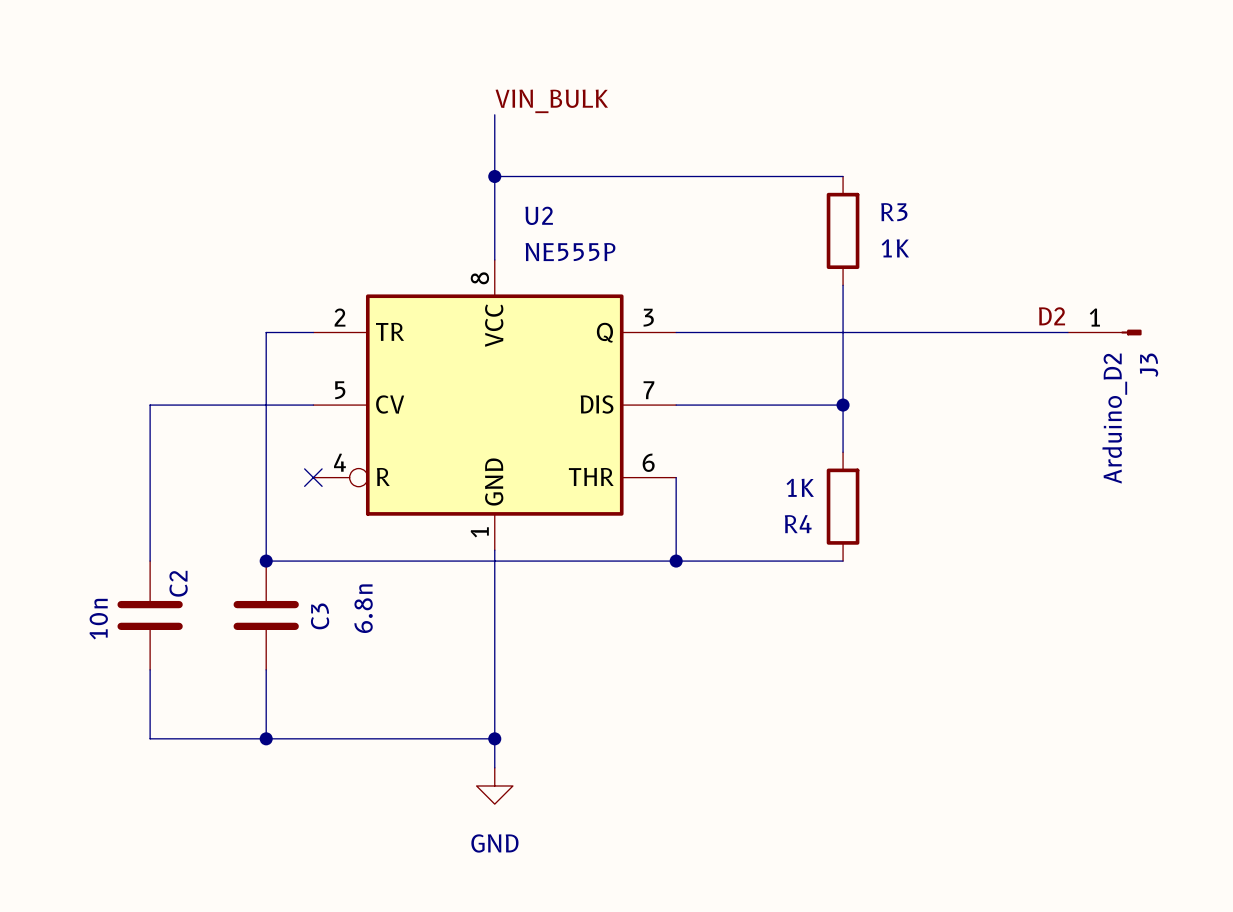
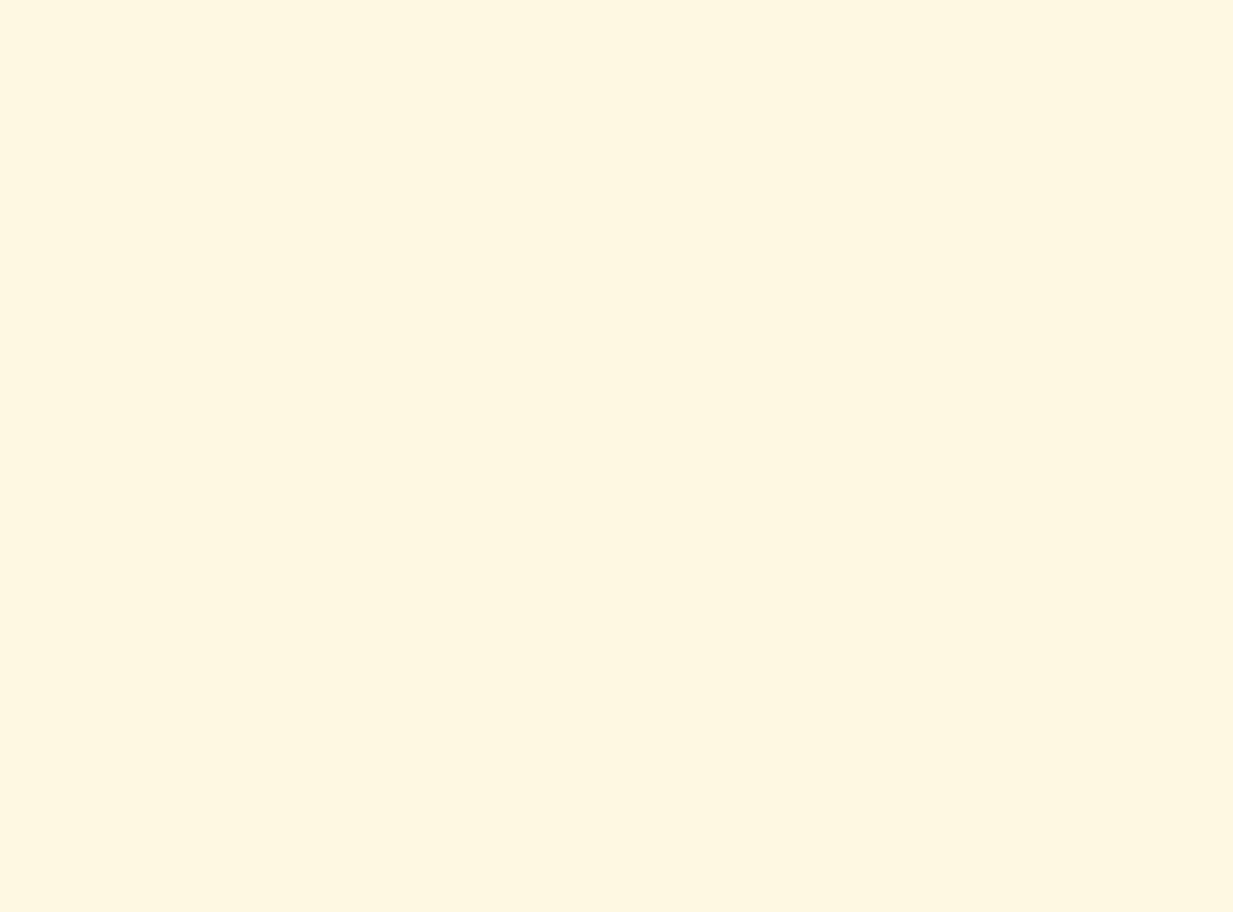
label: VIN_BULK (551, 101) -> none
wire: (494, 114) (494, 259) -> none
wire: (494, 176) (843, 176) -> none
junction: (494, 176) -> none
R3: 1K (843, 230) -> none
wire: (843, 285) (843, 452) -> none
label: D2 (1052, 316) -> none
wire: (313, 332) (266, 332) (266, 561) (843, 561) -> none
wire: (676, 332) (1067, 332) -> none
J3: Arduino_D2 (1104, 332) -> none
wire: (313, 405) (150, 405) (150, 561) -> none
U2: NE555P (494, 405) -> none
wire: (676, 405) (843, 405) -> none
junction: (843, 405) -> none
no-connect mark: (313, 477) -> none
wire: (676, 477) (676, 561) -> none
R4: 1K (843, 506) -> none
wire: (494, 550) (494, 767) -> none
junction: (266, 561) -> none
junction: (676, 561) -> none
C2: 10n (150, 615) -> none
C3: 6.8n (266, 615) -> none
wire: (150, 669) (150, 738) (494, 738) -> none
wire: (266, 669) (266, 738) -> none
junction: (266, 738) -> none
junction: (494, 738) -> none
power symbol: GND (494, 785) -> none

